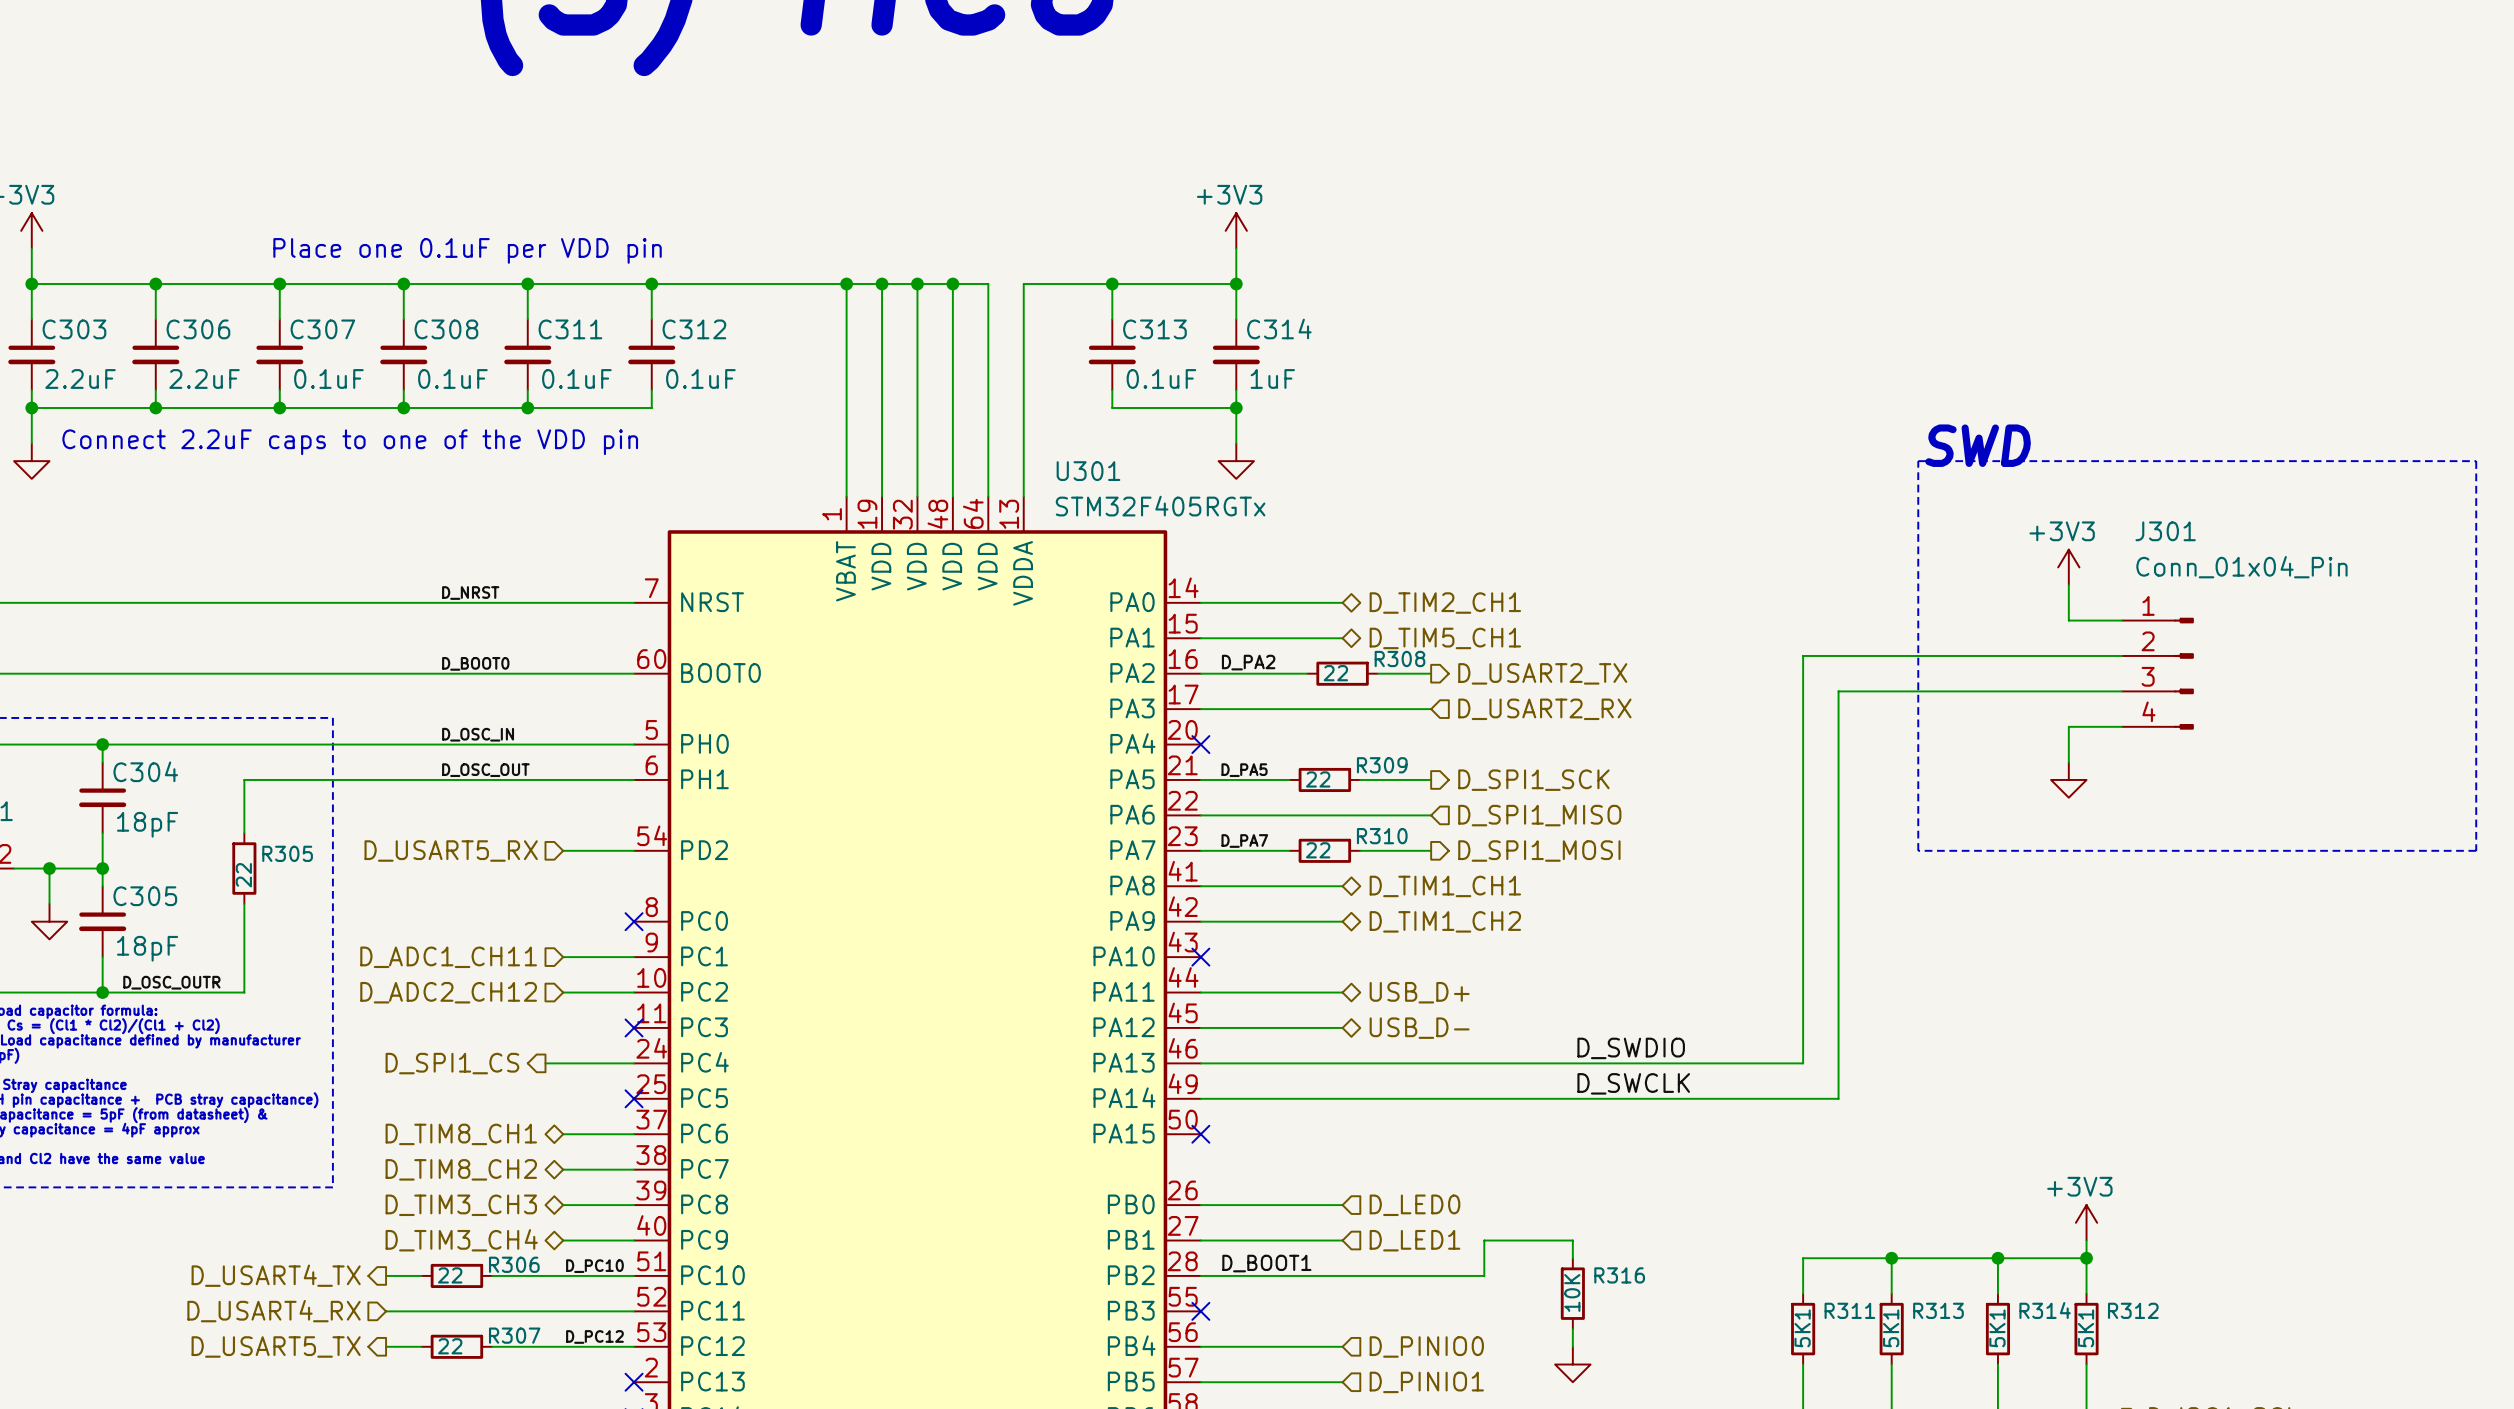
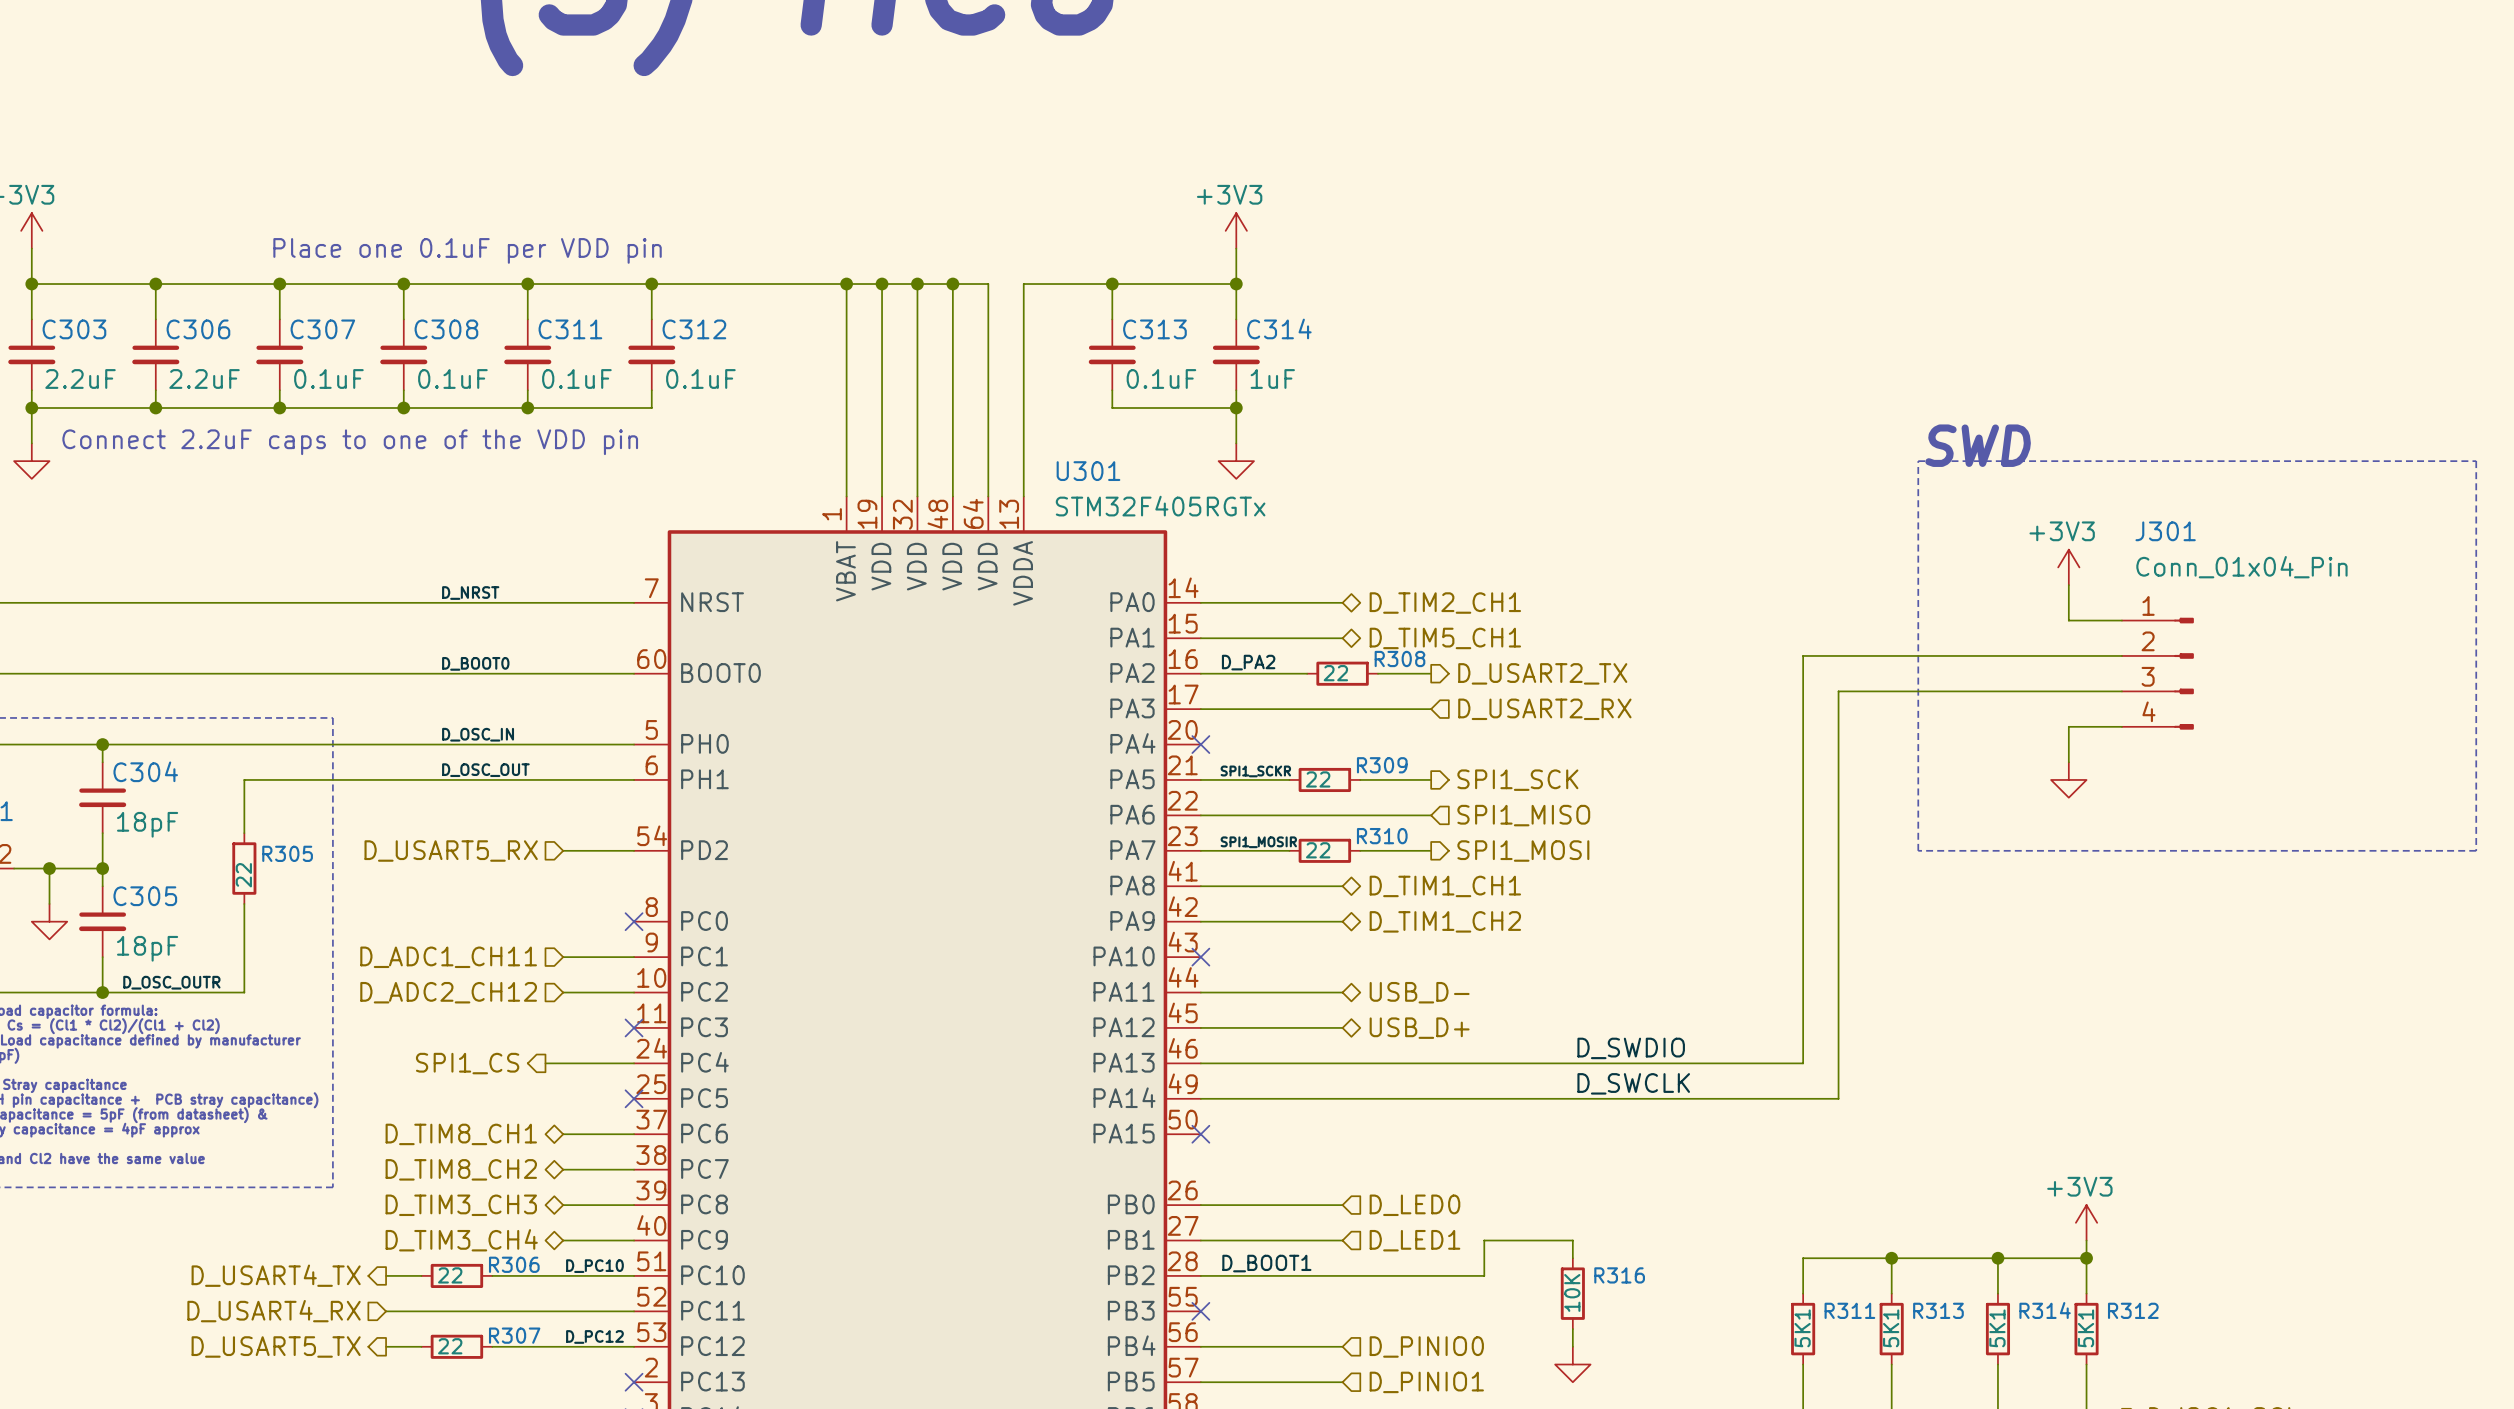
label: D_PA5 (1244, 770) -> SPI1_SCKR (1255, 771)
hierarchical label: D_SPI1_SCK (1533, 780) -> SPI1_SCK (1517, 780)
hierarchical label: D_SPI1_MISO (1539, 815) -> SPI1_MISO (1523, 815)
label: D_PA7 (1244, 841) -> SPI1_MOSIR (1258, 842)
hierarchical label: D_SPI1_MOSI (1539, 851) -> SPI1_MOSI (1523, 851)
hierarchical label: USB_D+ (1419, 992) -> USB_D- (1419, 992)
hierarchical label: USB_D- (1419, 1028) -> USB_D+ (1419, 1028)
hierarchical label: D_SPI1_CS (452, 1063) -> SPI1_CS (467, 1063)

